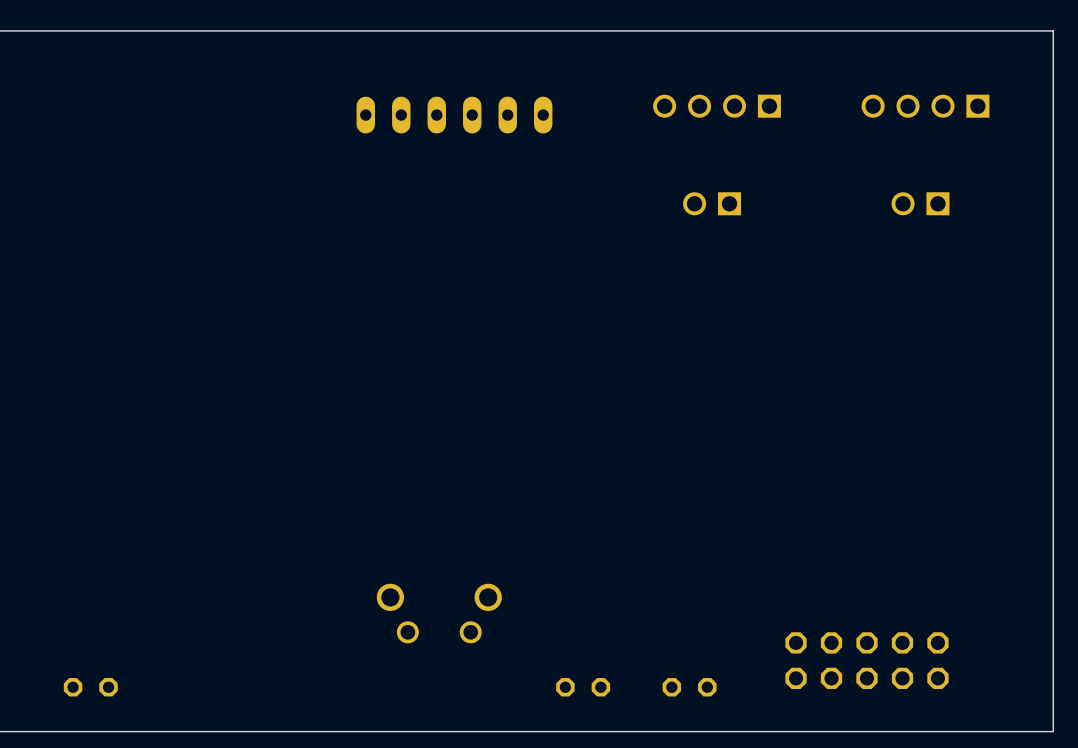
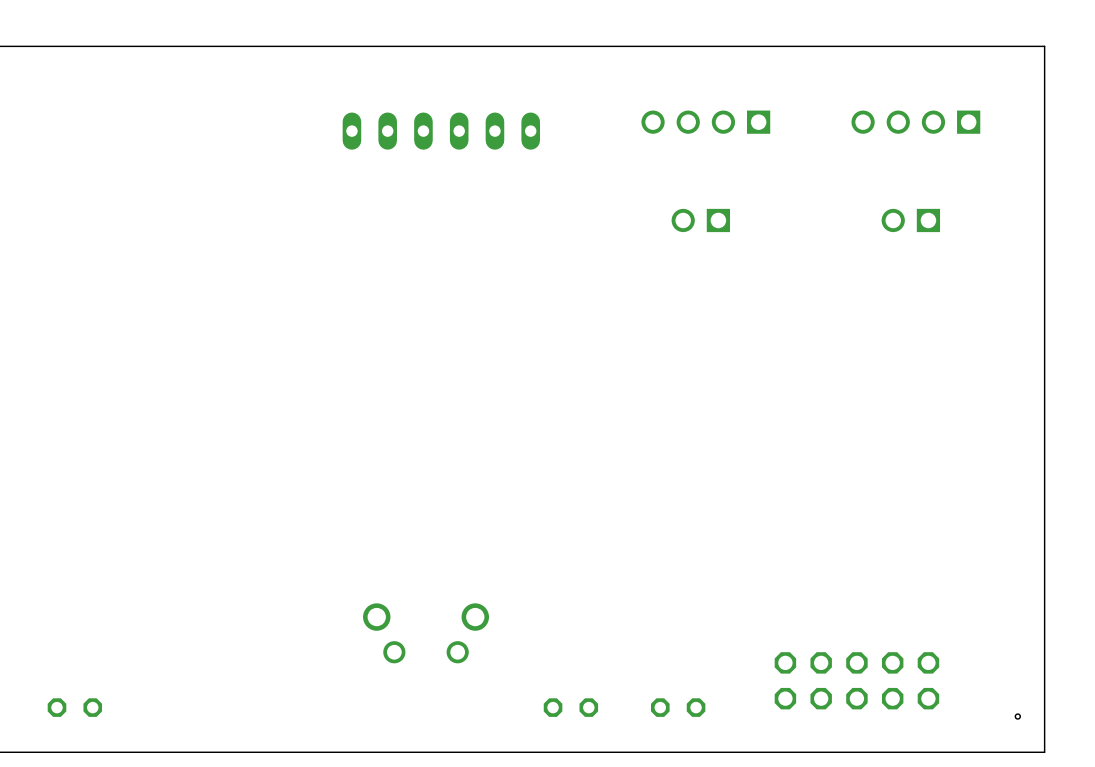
hole: none -> (1017, 716)

